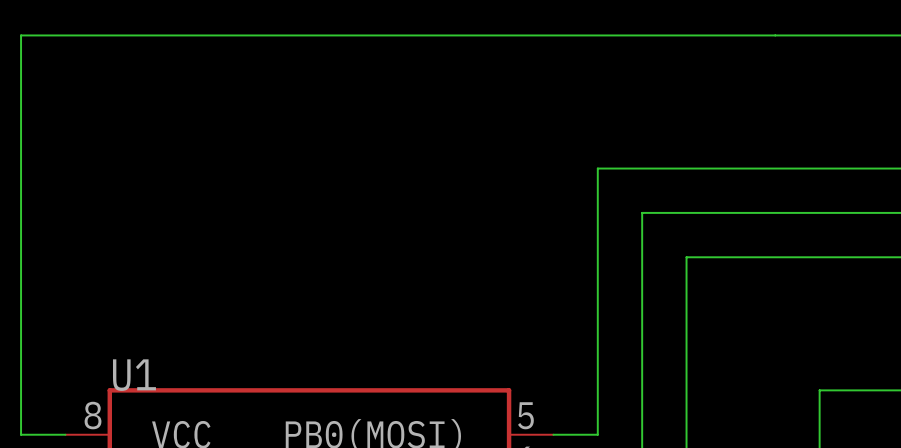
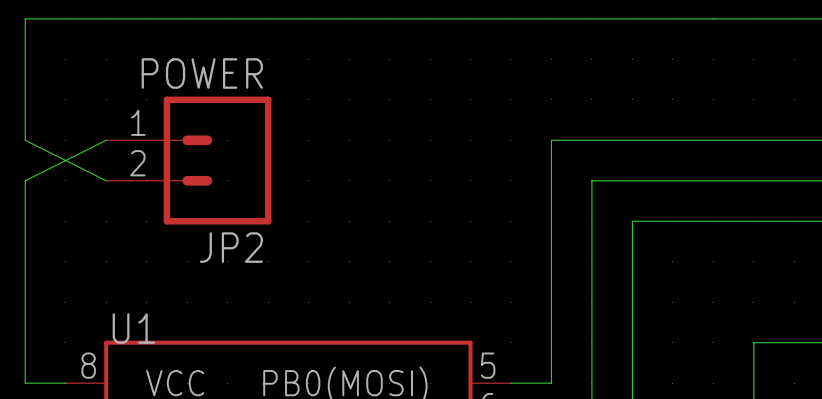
wire: (21, 168) (21, 212) -> (25, 140) (106, 180)
wire: none -> (106, 140) (25, 180)
JP2: none -> POWER (188, 160)

